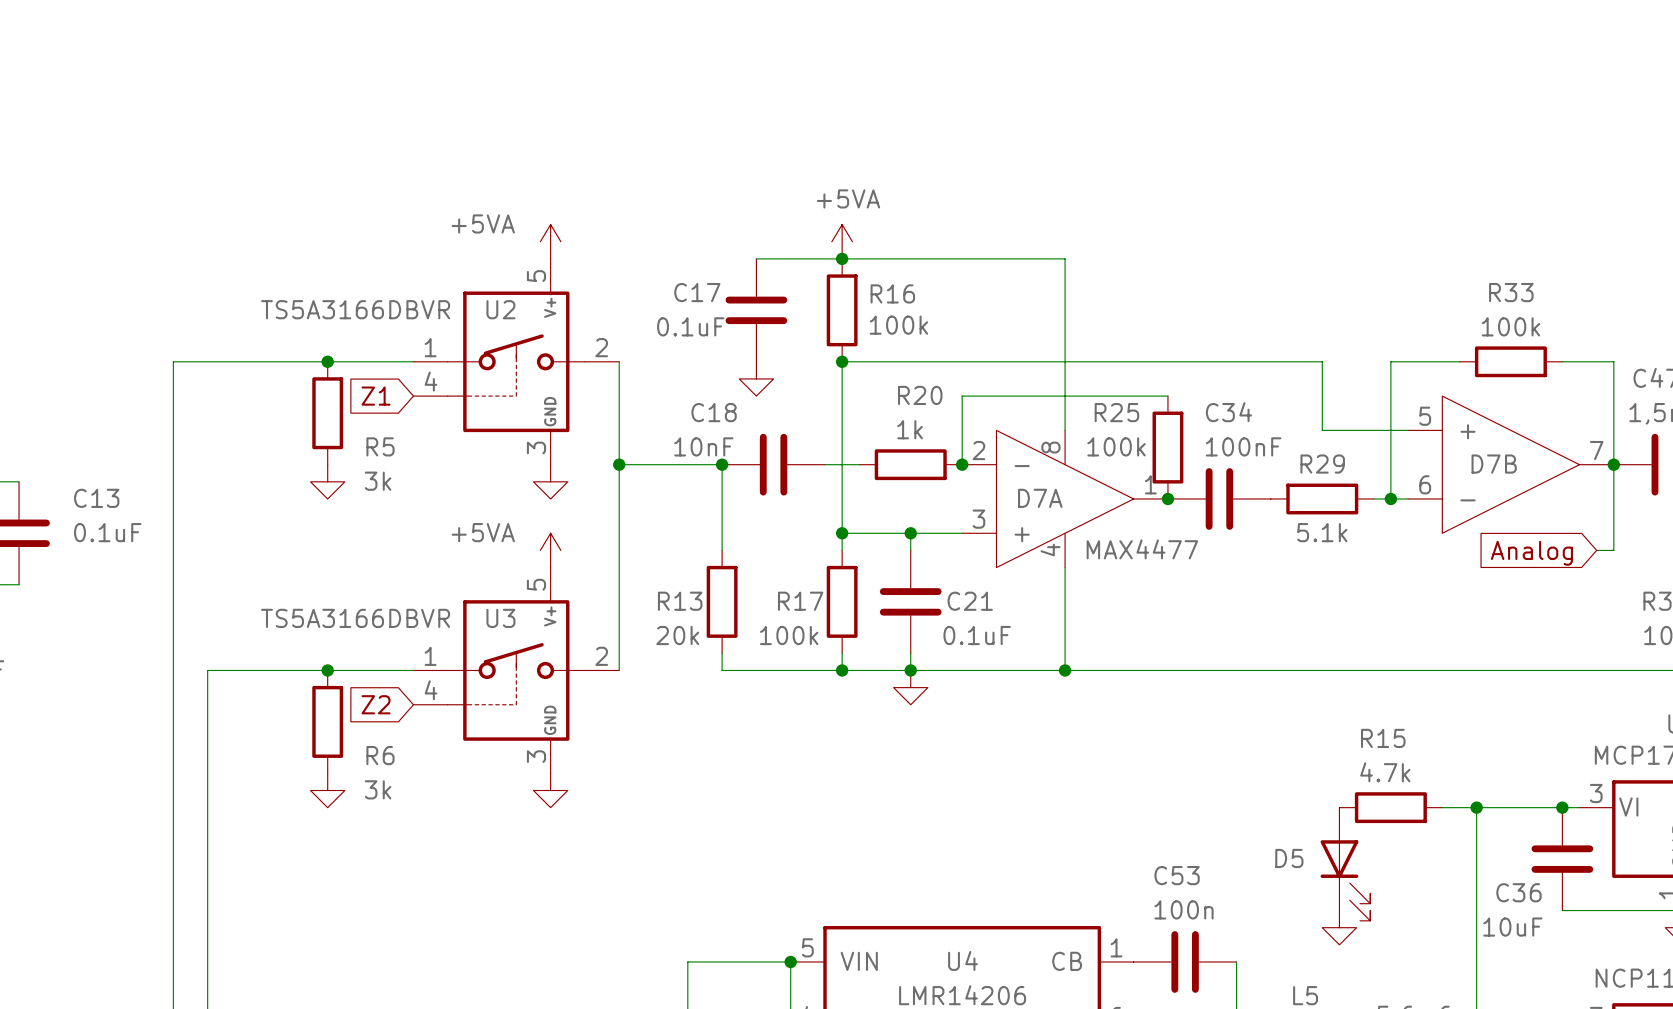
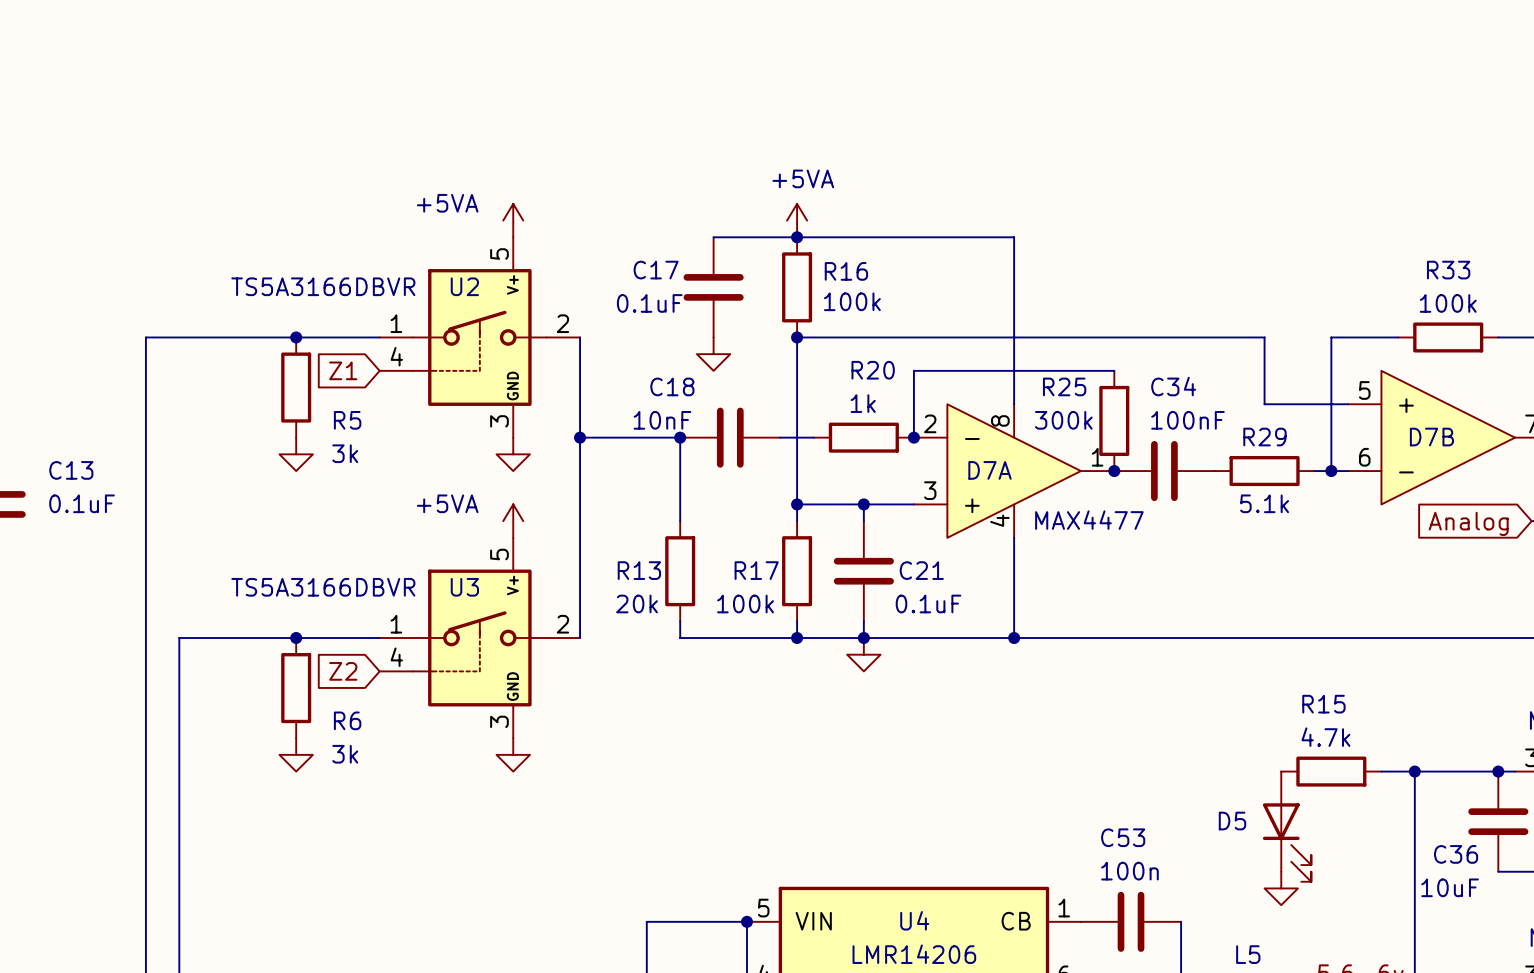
R25 value: 100k (1116, 446) -> 300k (1063, 420)

